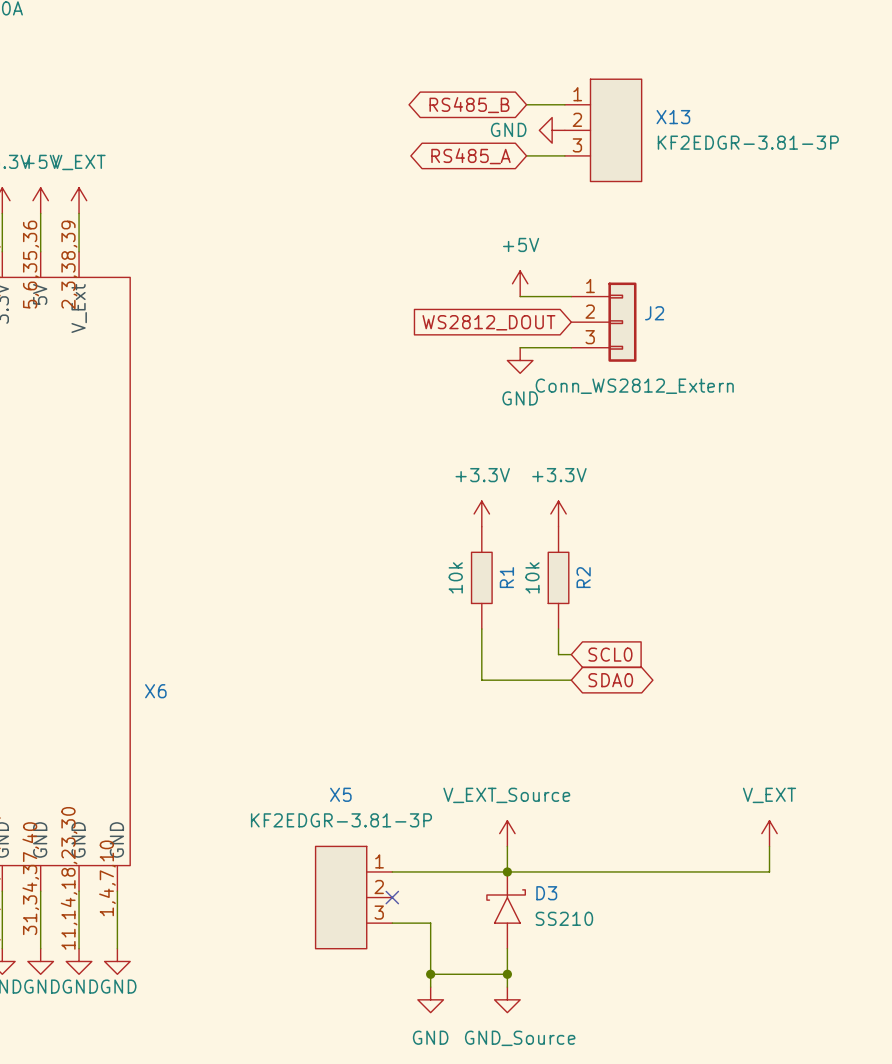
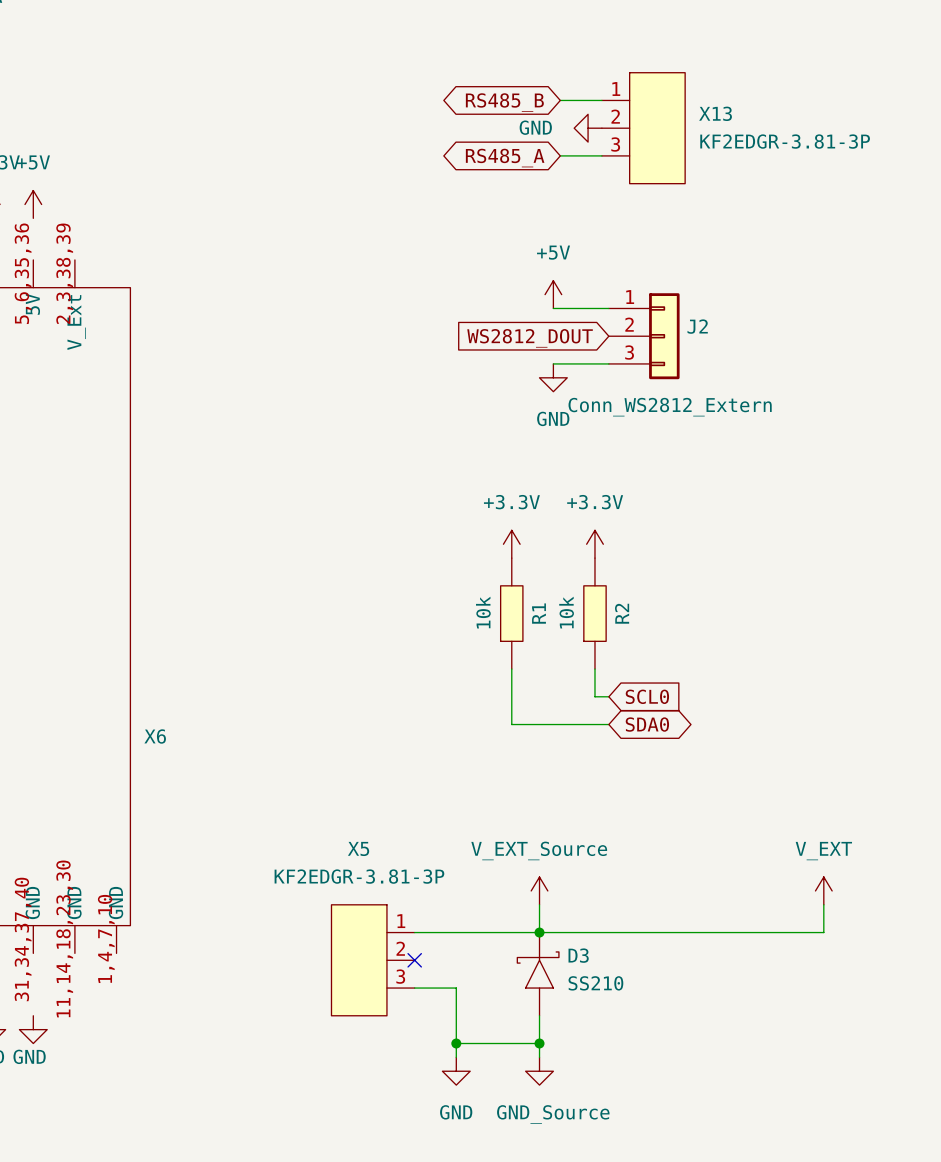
power symbol: V_EXT (79, 200) -> none
wire: (40, 213) (40, 251) -> none
wire: (79, 213) (79, 251) -> none
wire: (40, 891) (40, 948) -> none
wire: (79, 891) (79, 948) -> none
wire: (117, 891) (117, 948) -> none
power symbol: GND (79, 961) -> none
power symbol: GND (117, 961) -> none

